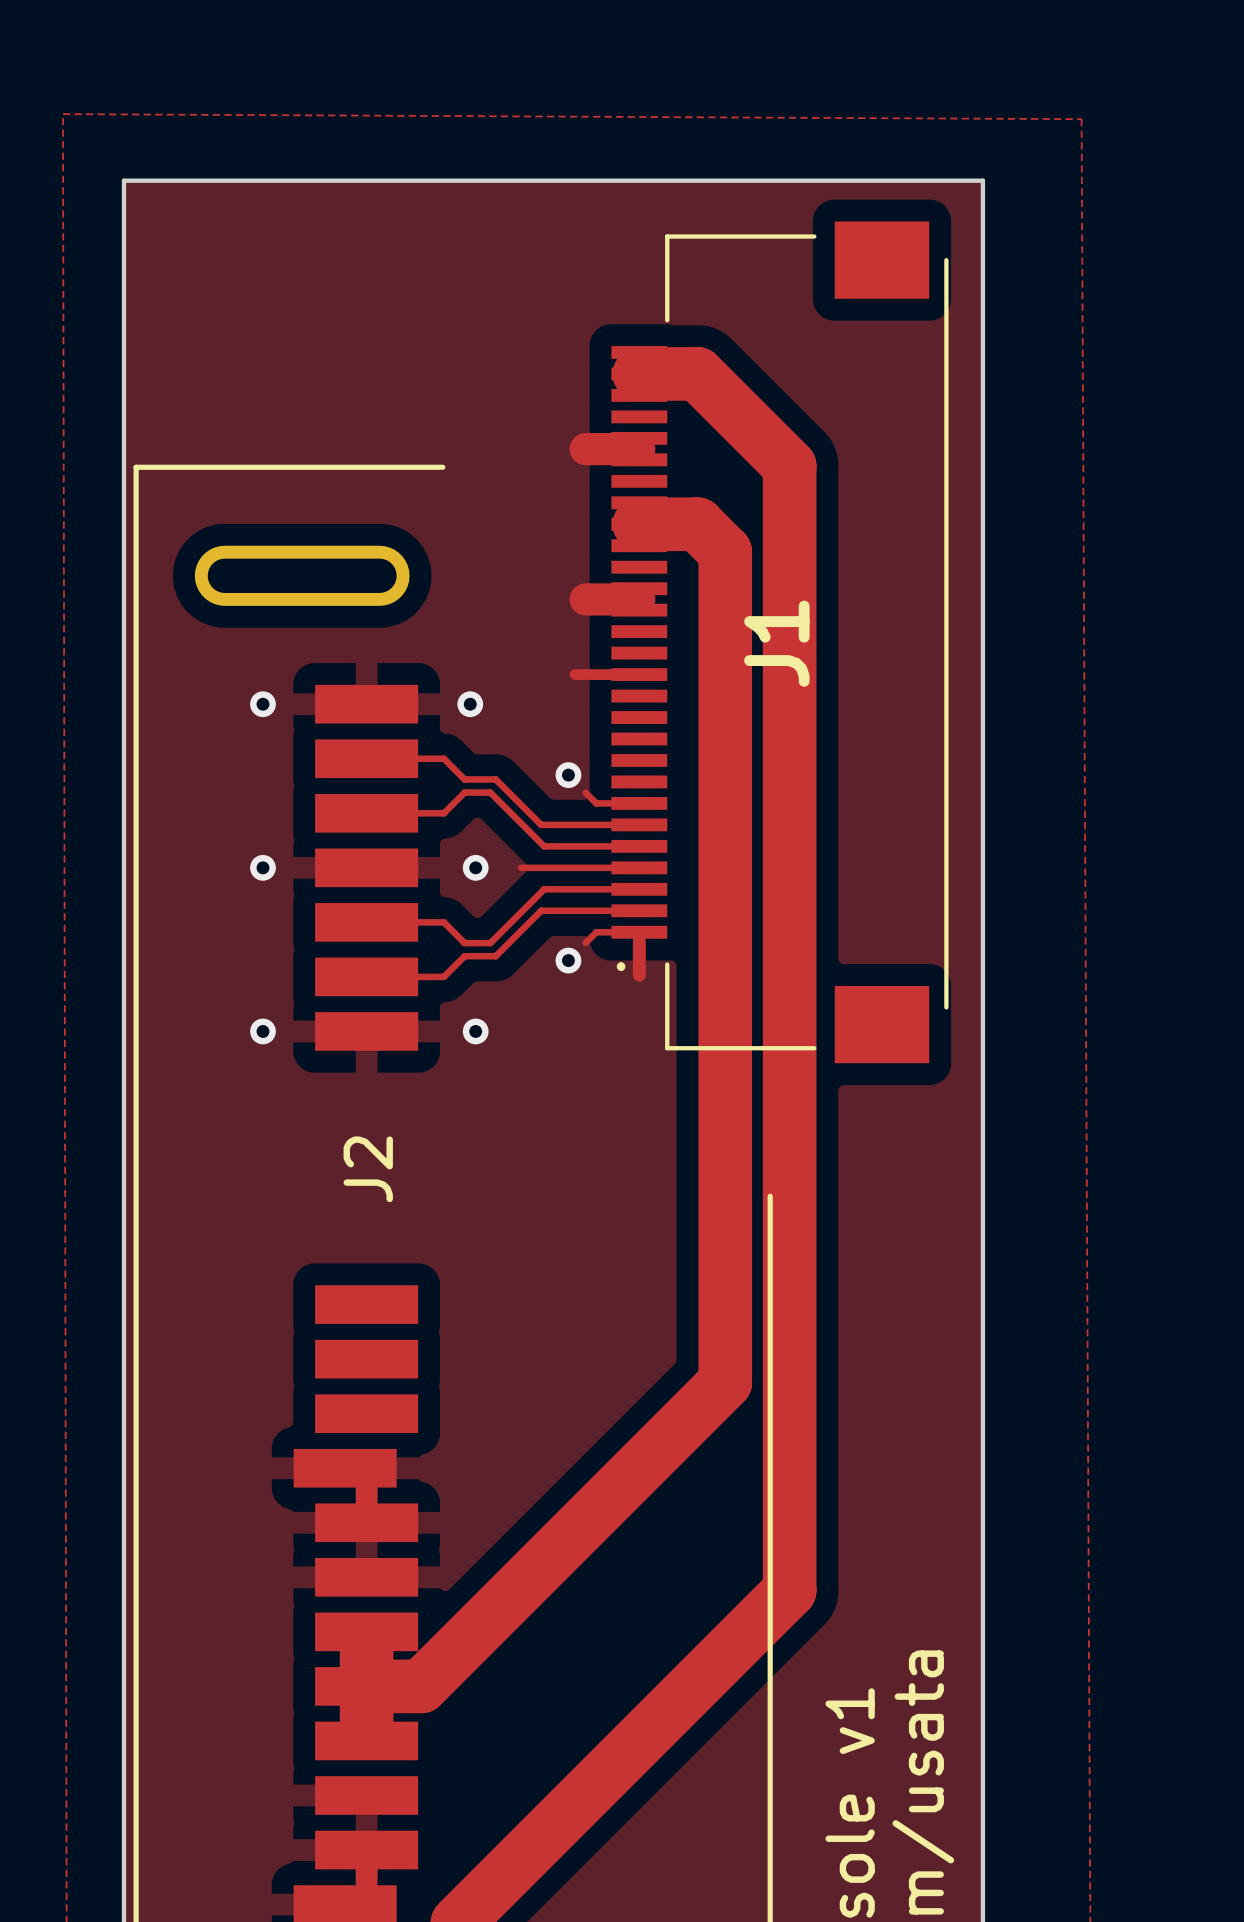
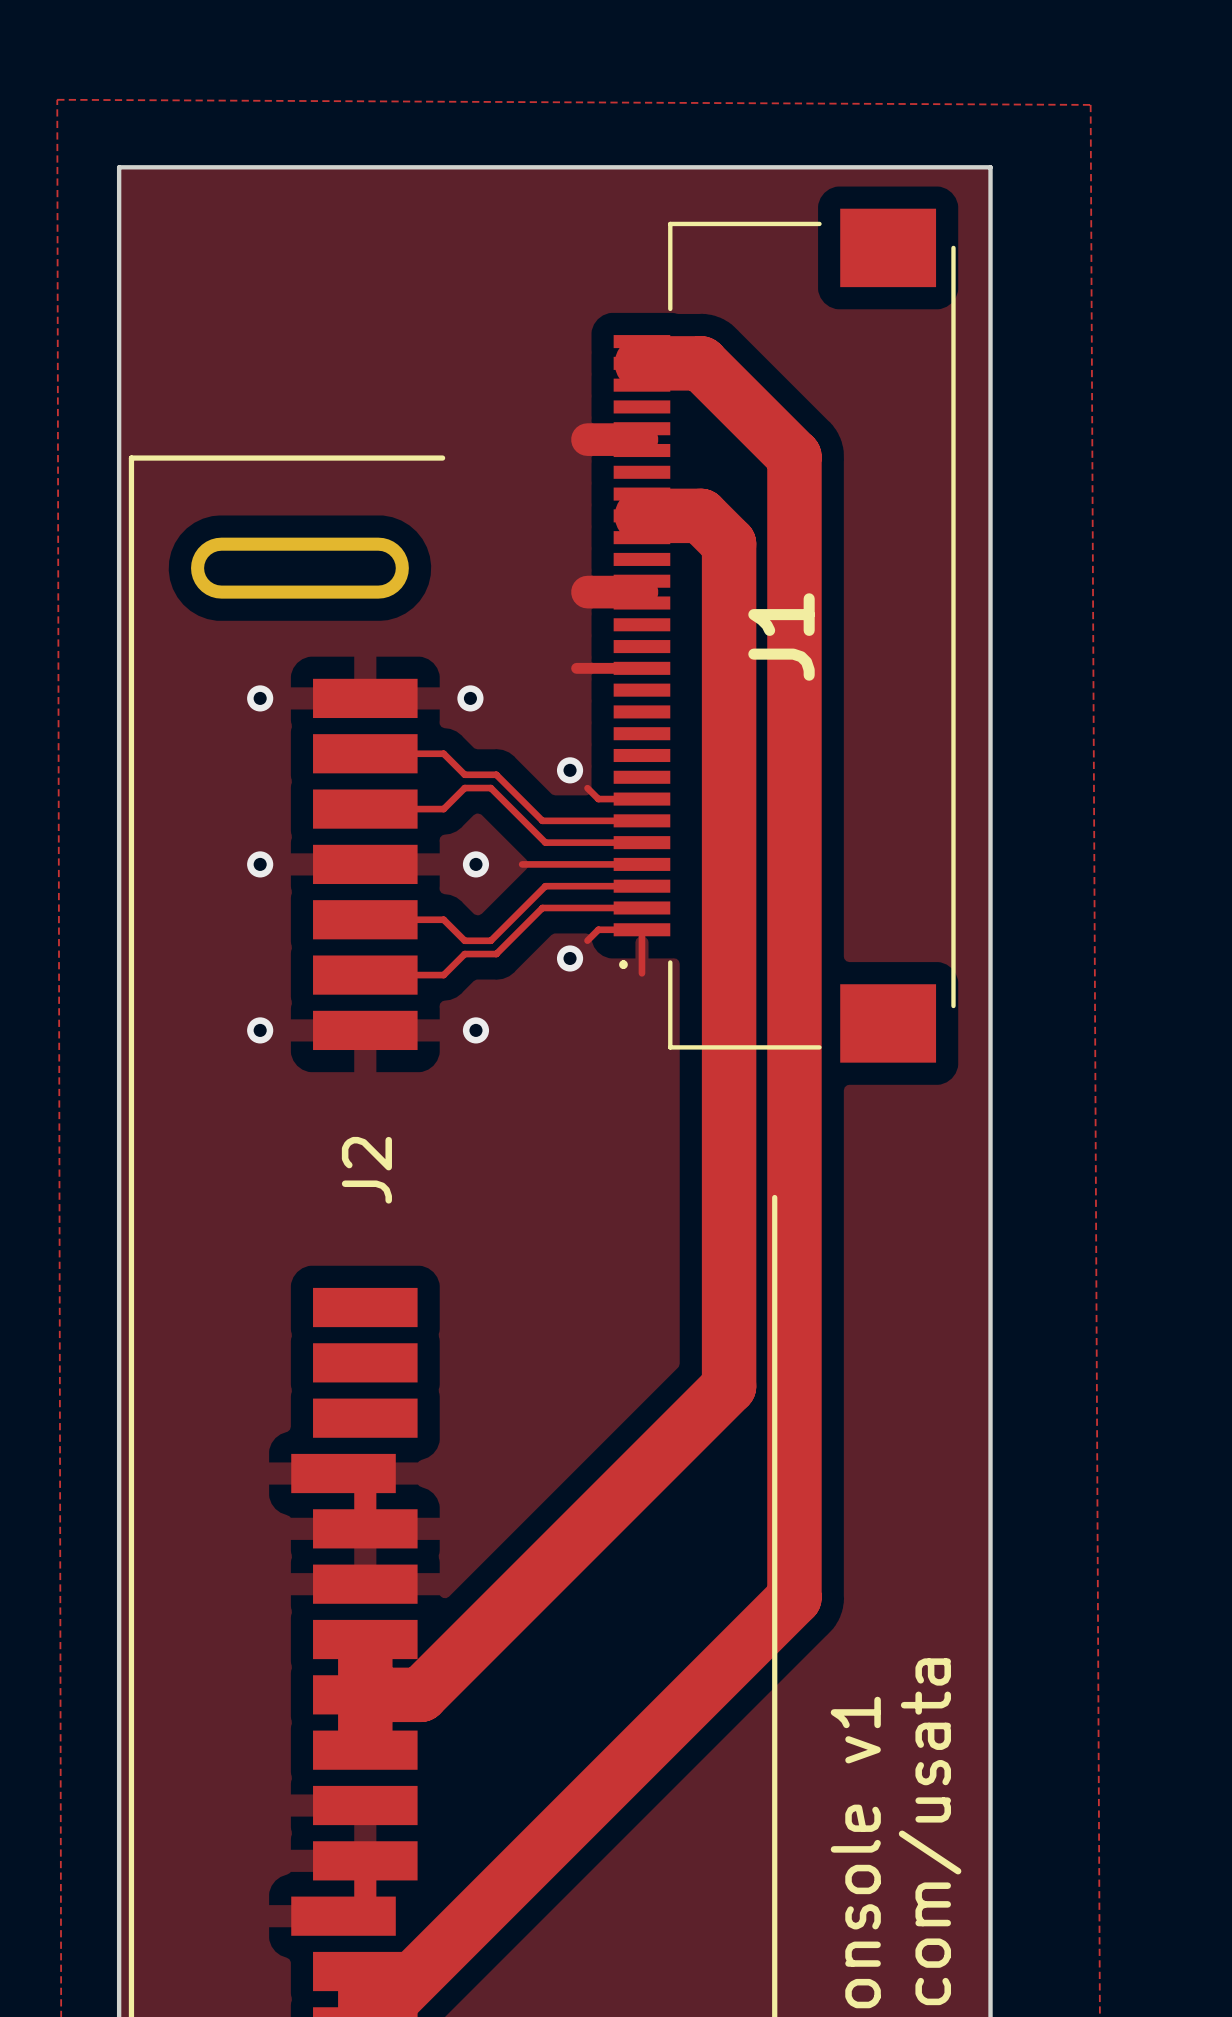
track width: thick (639, 936) (639, 975) -> thin (641, 934) (641, 973)

